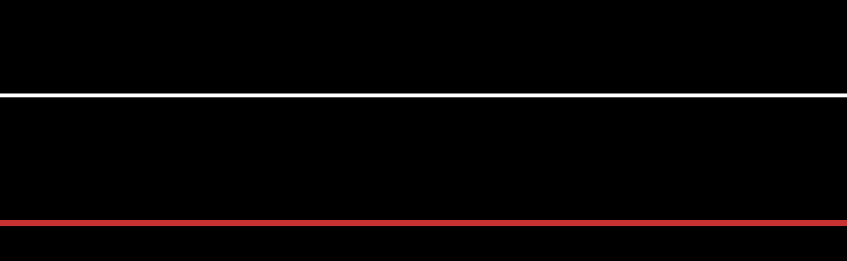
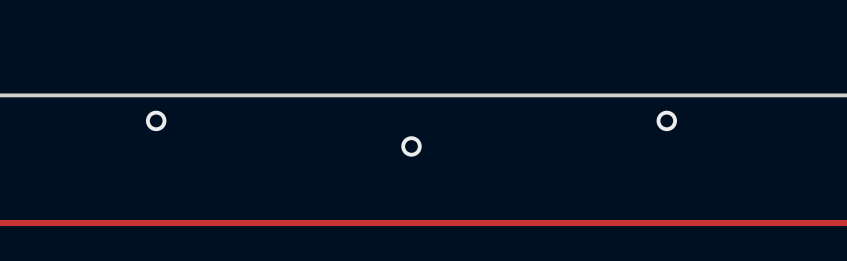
via: none -> (156, 120)
via: none -> (666, 120)
via: none -> (411, 146)

